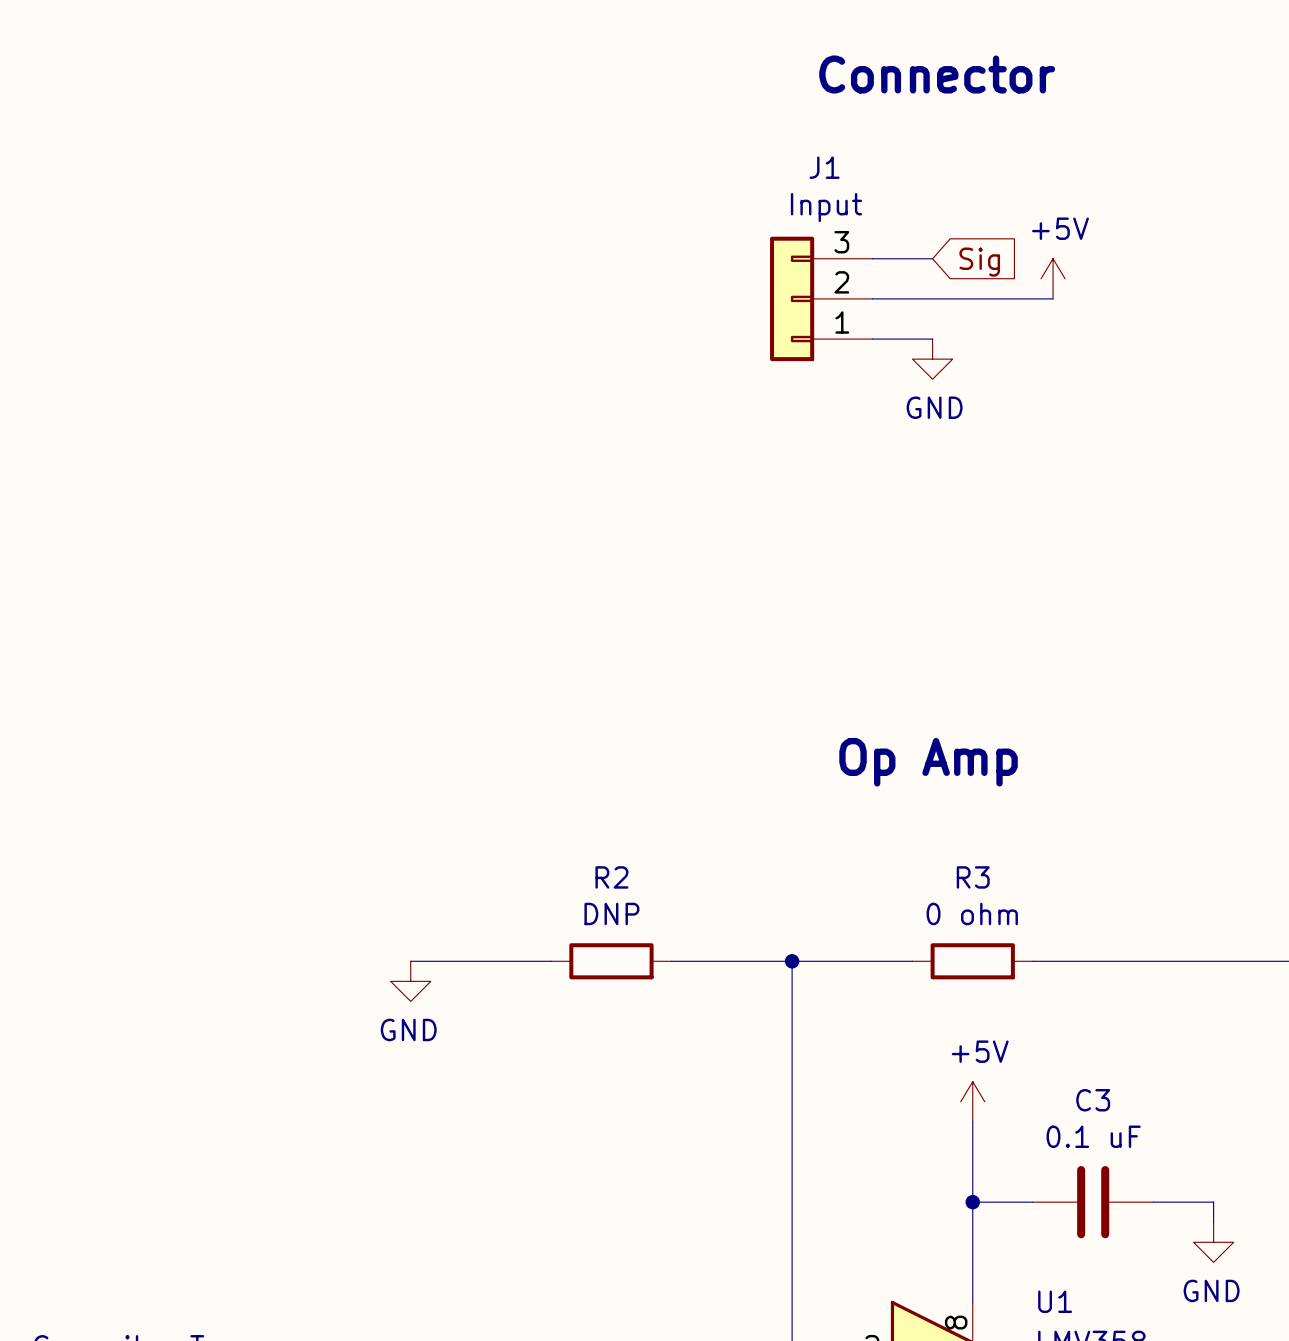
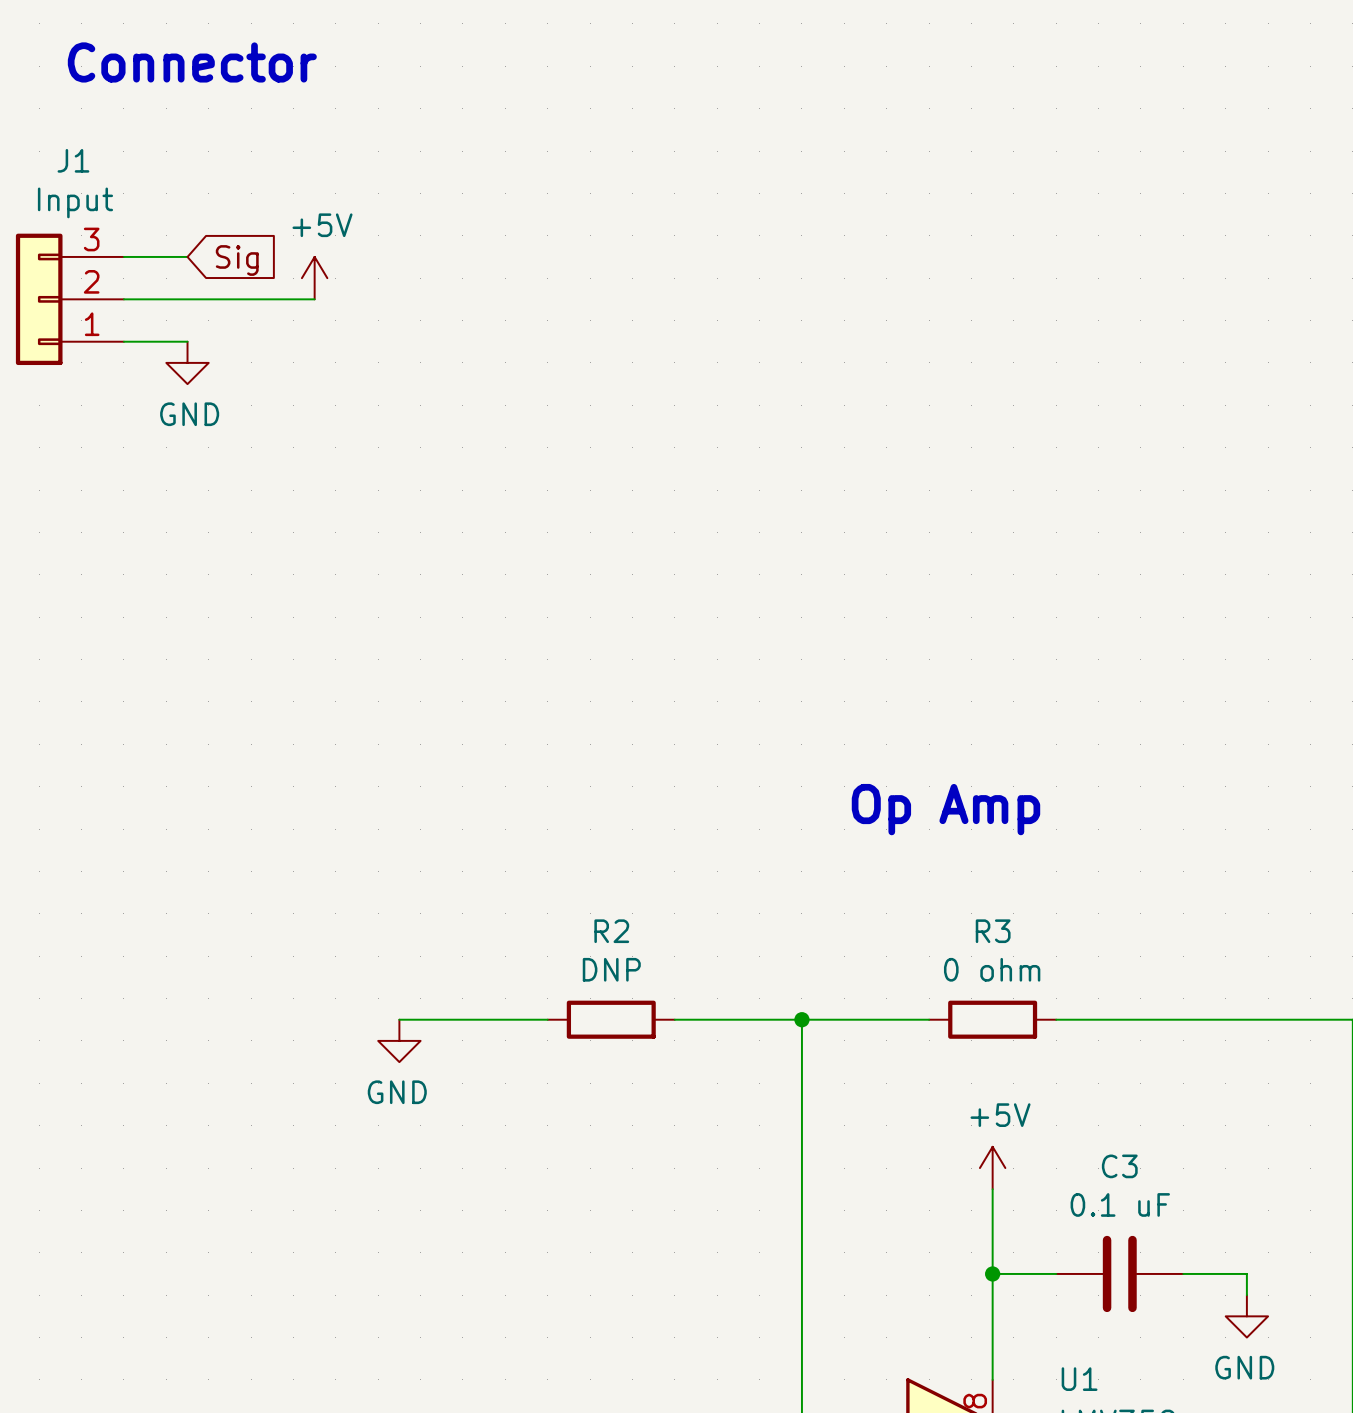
text: none -> Connector (192, 62)
text: Connector (937, 74) -> none
wire: none -> (123, 256) (187, 256)
global label: none -> Sig (237, 260)
power symbol: none -> +5V (314, 278)
wire: (872, 258) (932, 258) -> none
global label: Sig (979, 262) -> none
wire: none -> (123, 299) (314, 299)
power symbol: +5V (1053, 278) -> none
J1 position: (821, 298) -> (69, 299)
wire: (872, 298) (1053, 298) -> none
wire: none -> (123, 341) (187, 341)
power symbol: none -> GND (187, 362)
wire: (872, 339) (932, 339) -> none
power symbol: GND (932, 359) -> none

